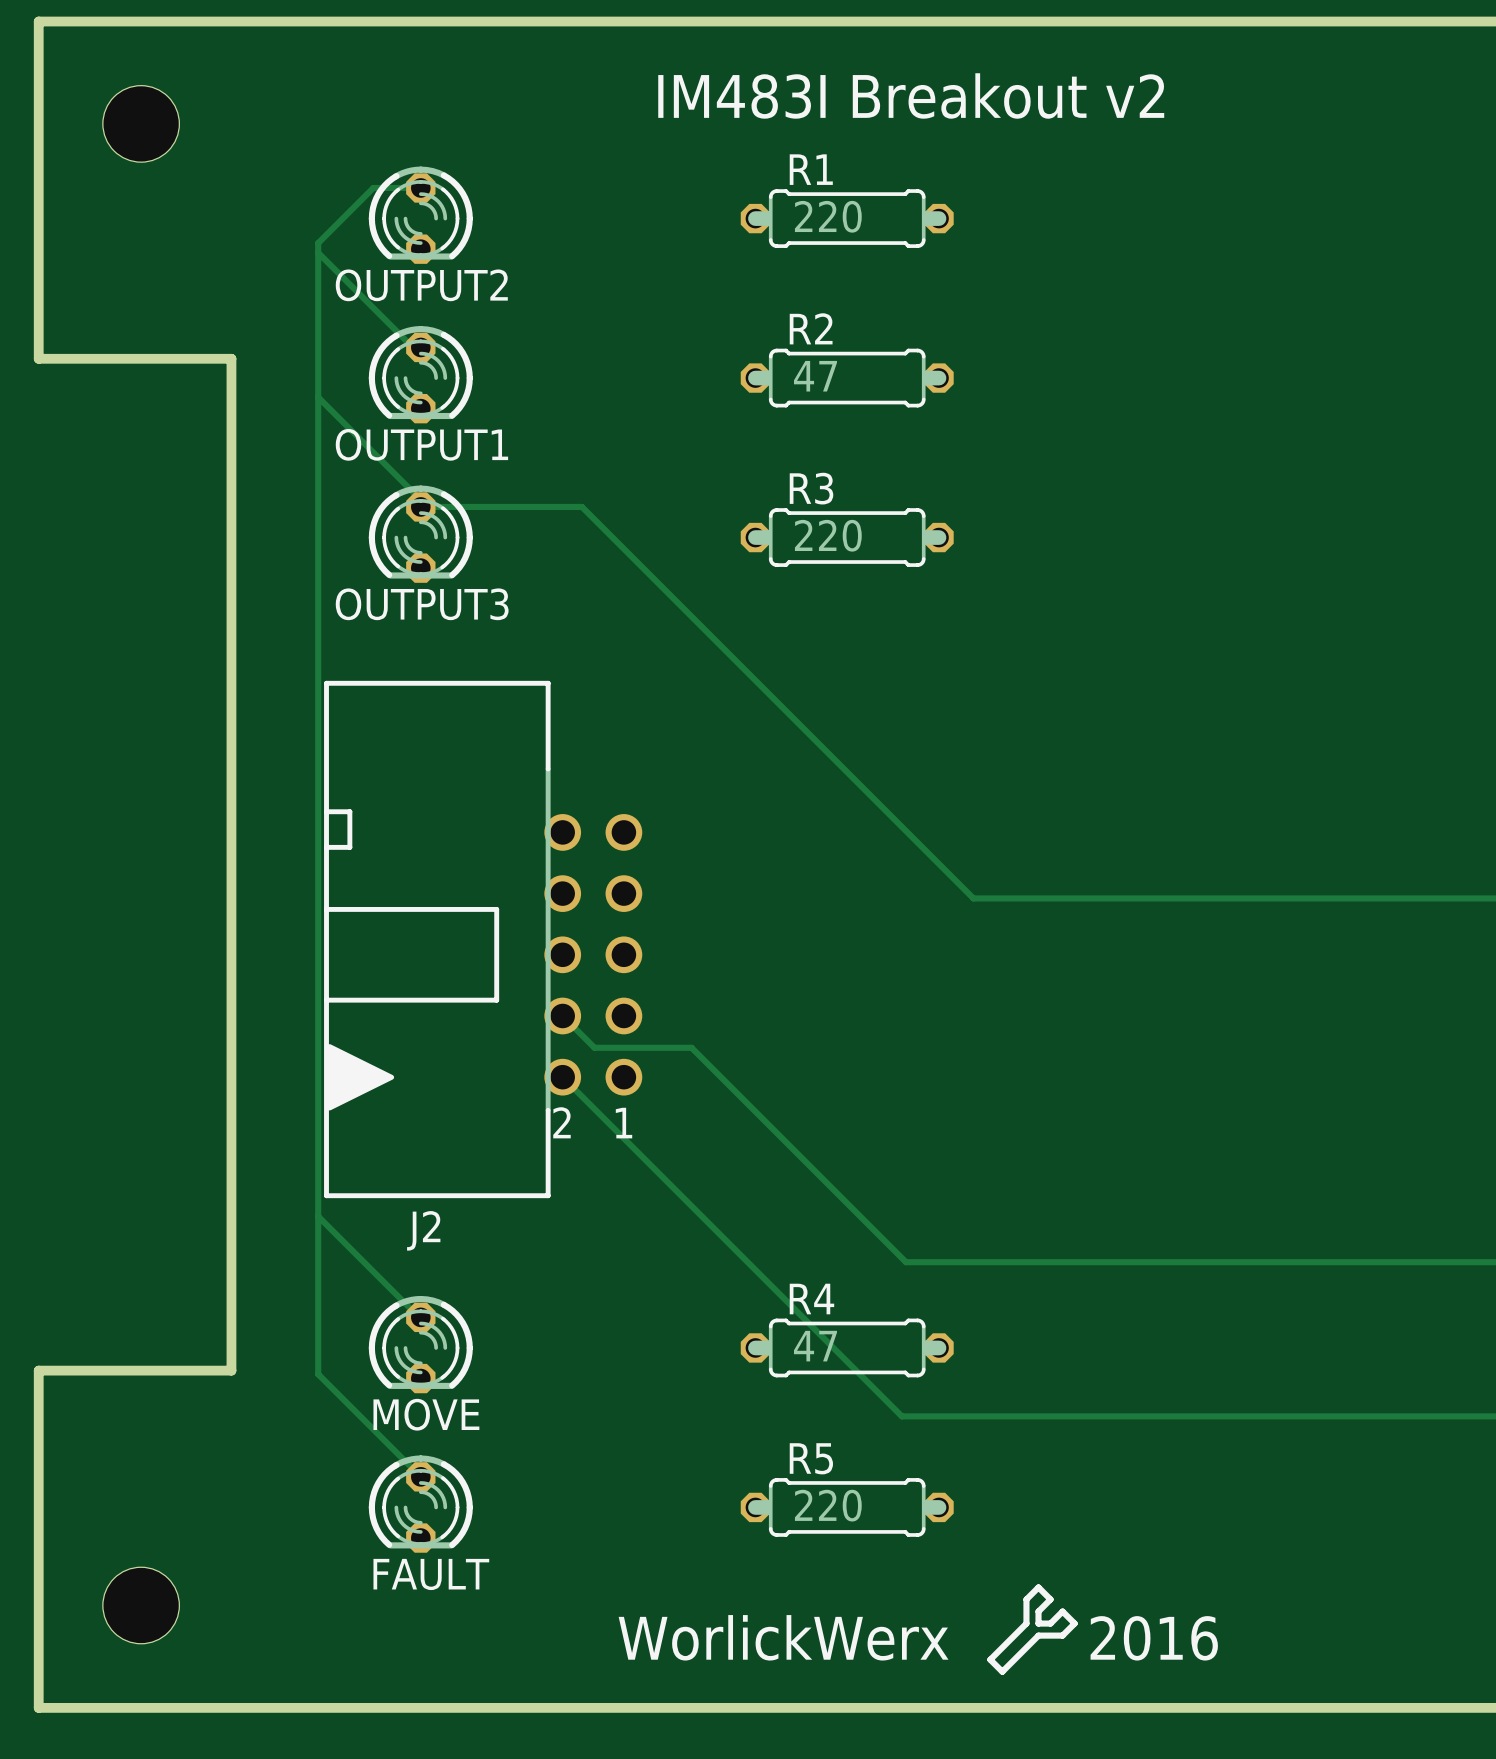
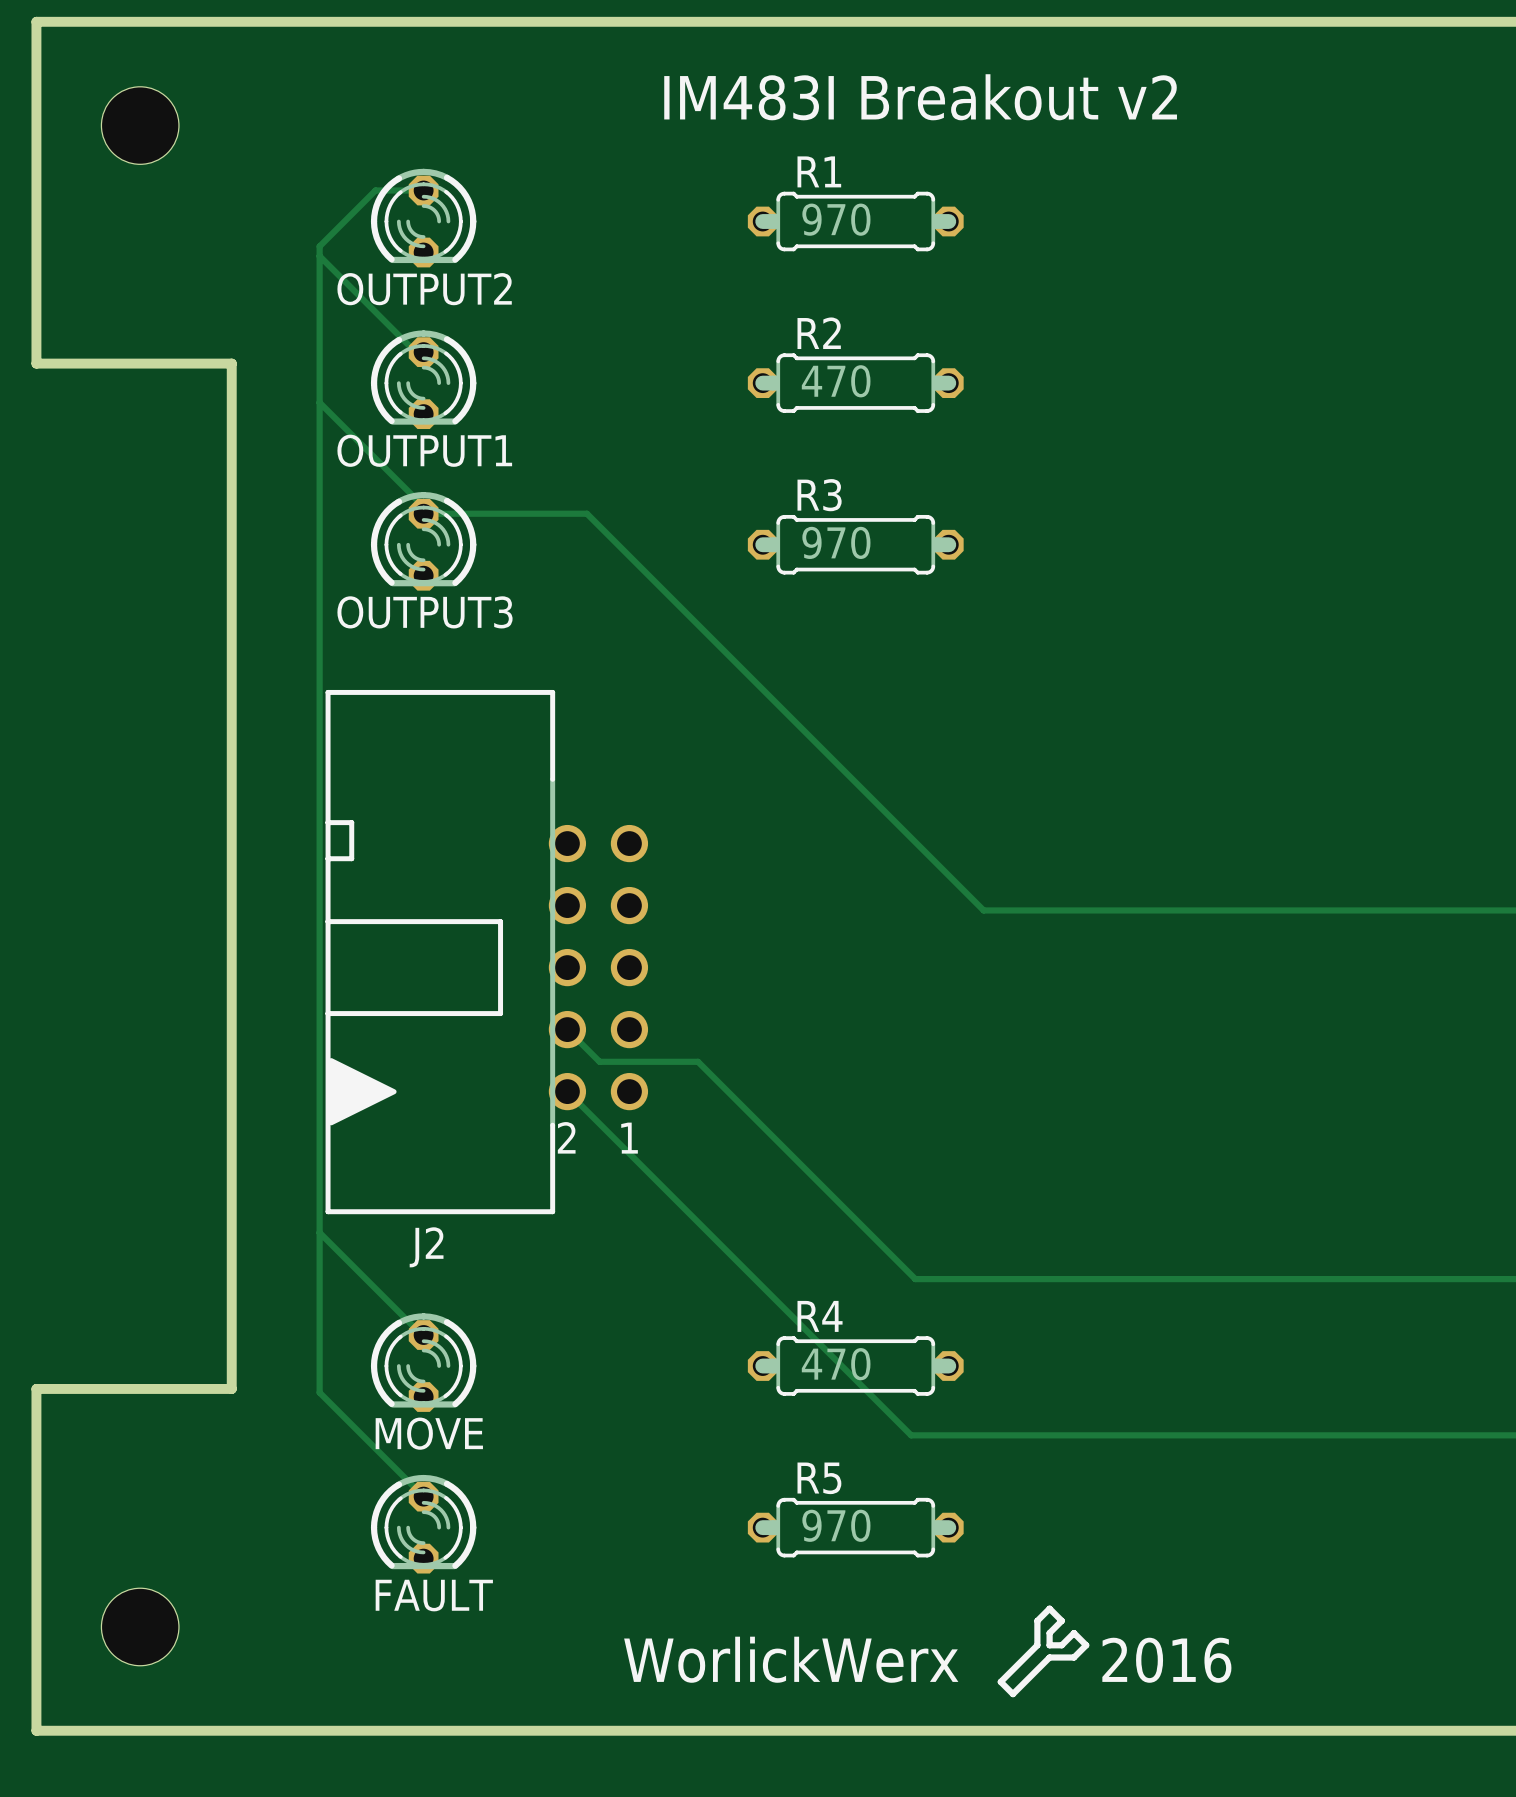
R1 value: 220 (828, 216) -> 970 (836, 219)
R2 value: 47 (815, 376) -> 470 (836, 381)
R3 value: 220 (828, 535) -> 970 (836, 542)
R4 value: 47 (815, 1346) -> 470 (836, 1364)
R5 value: 220 (828, 1505) -> 970 (836, 1525)

